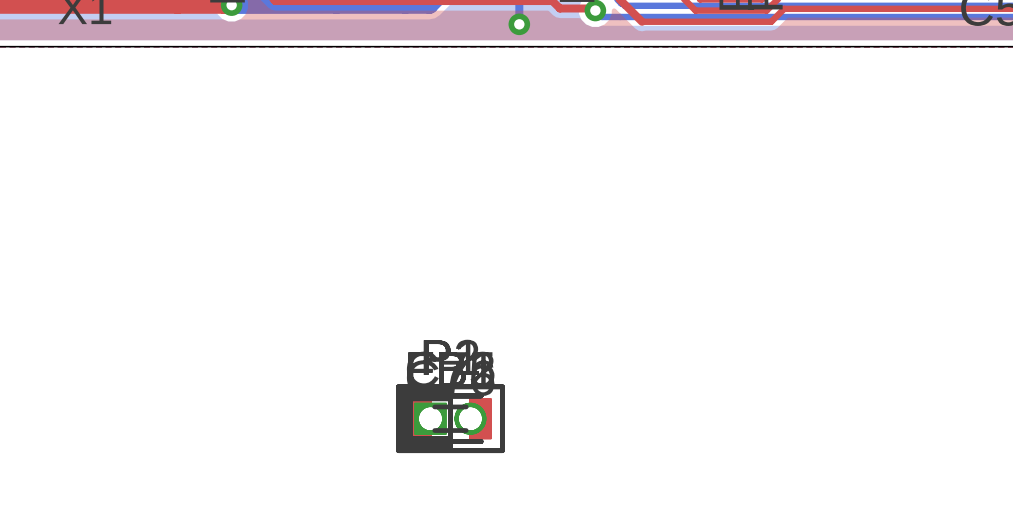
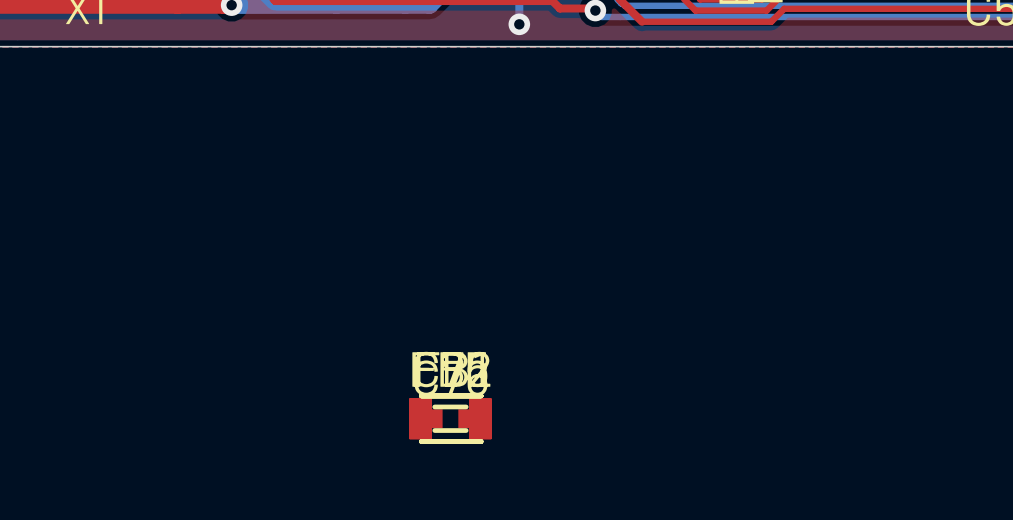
part: (450, 418) -> none
part: (450, 418) -> none

